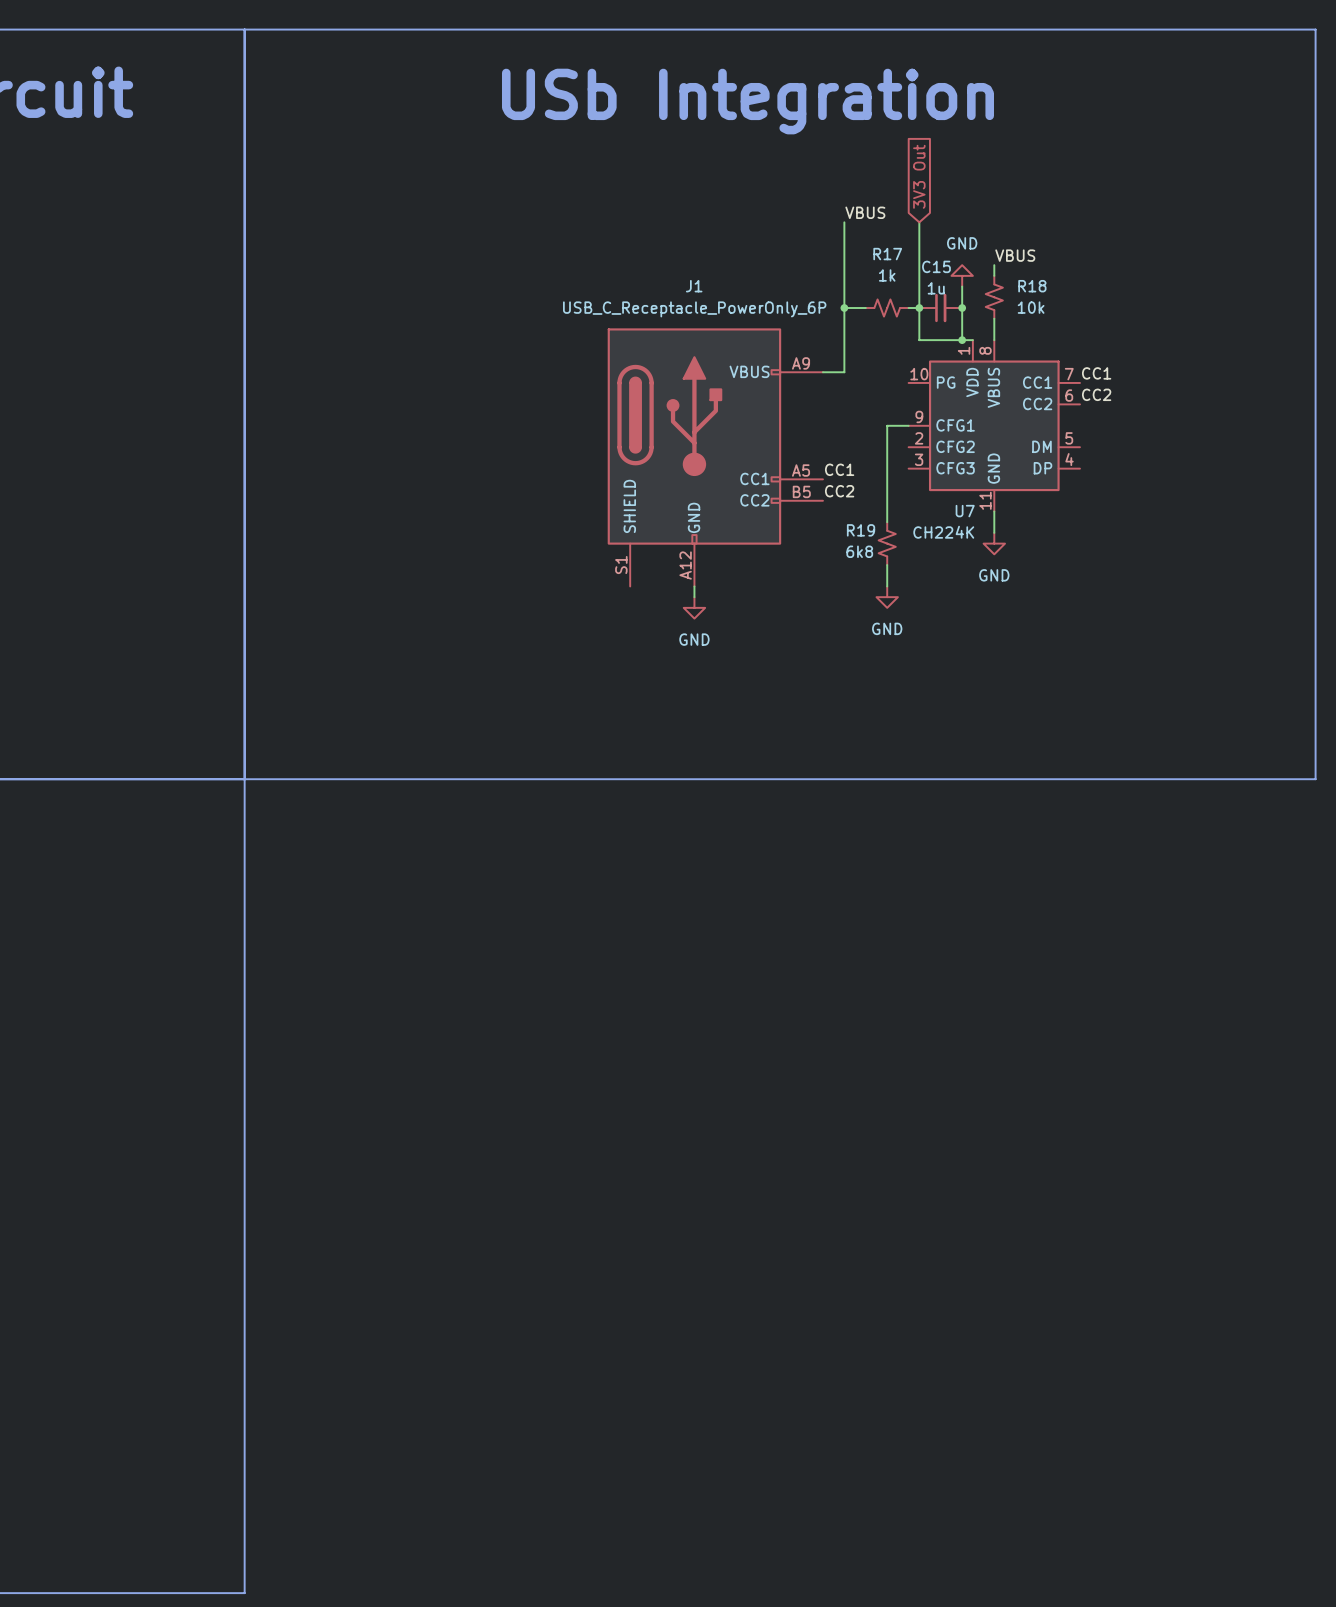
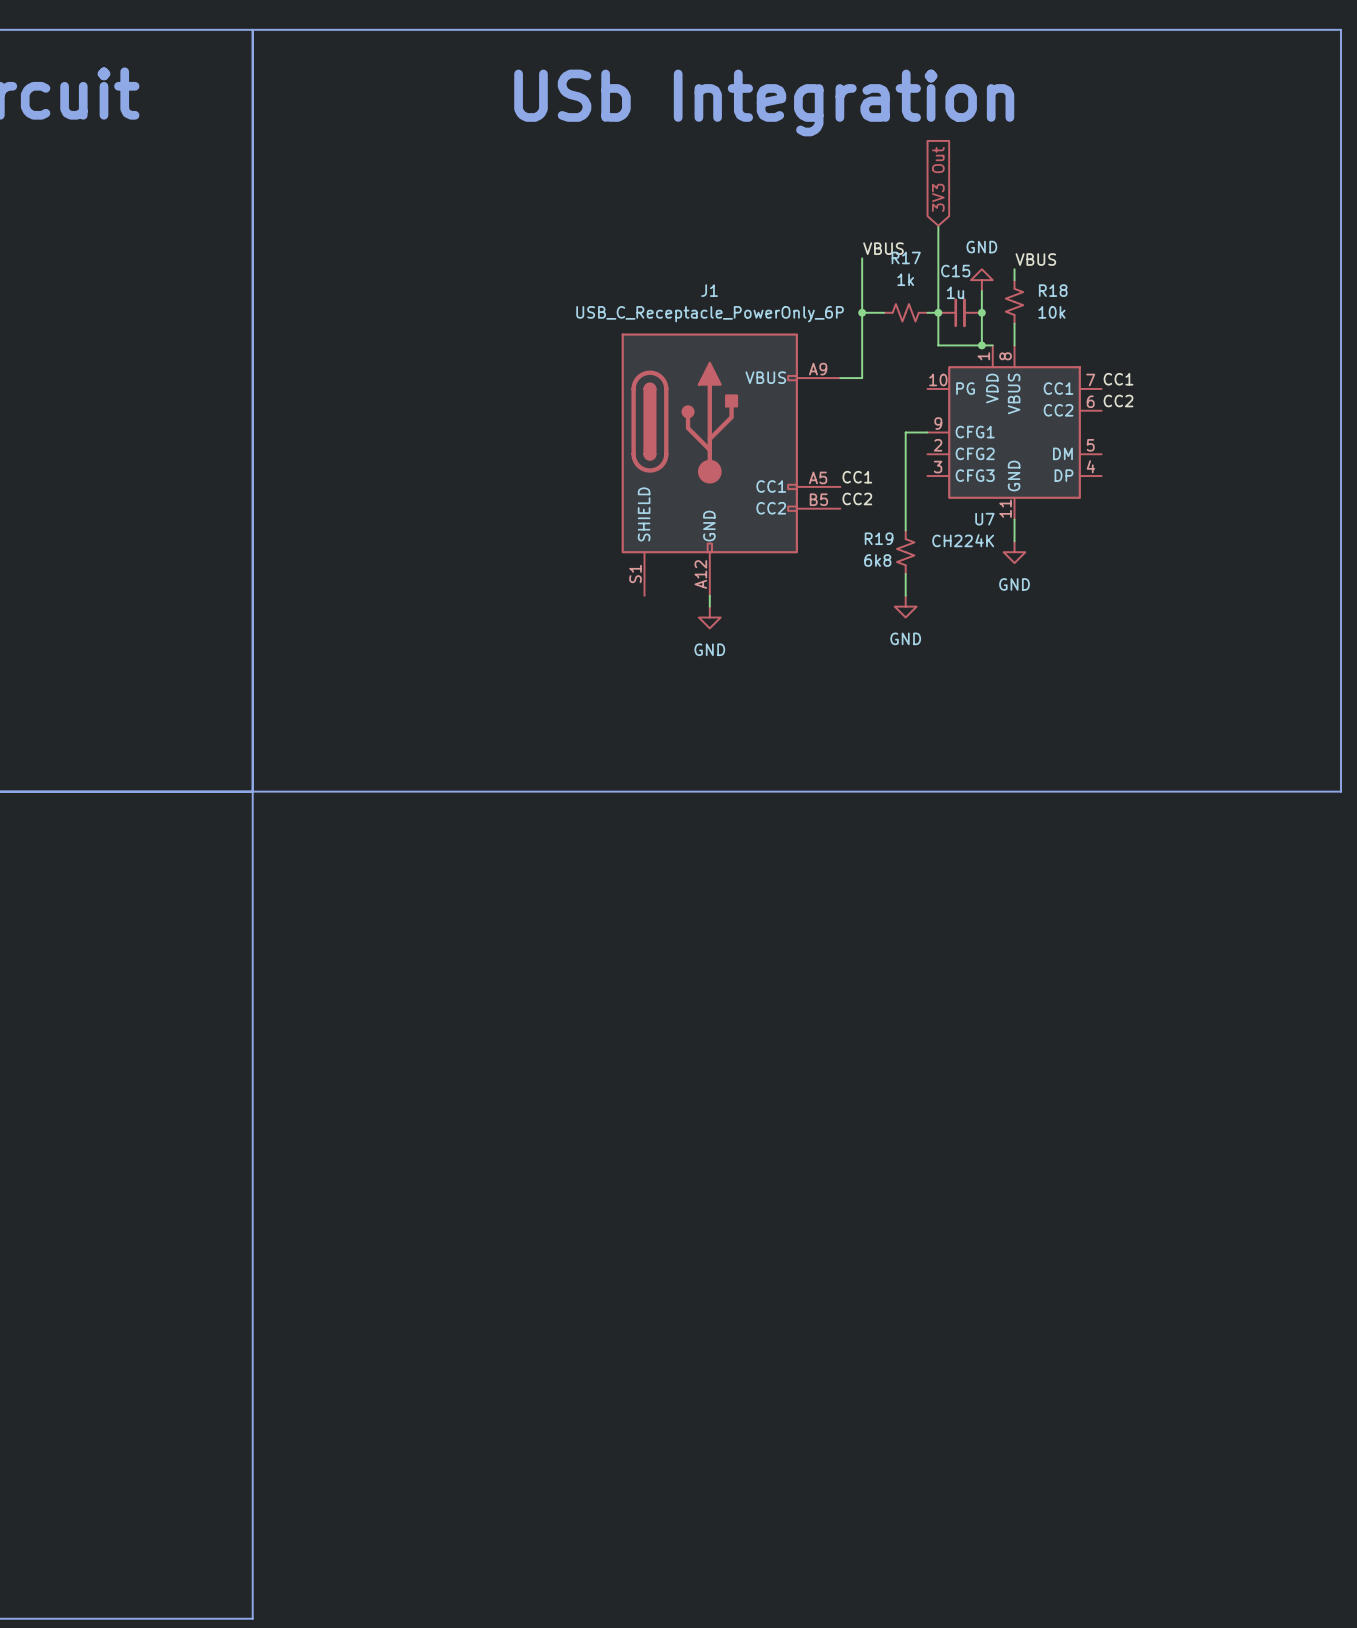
label position: VBUS (865, 212) -> VBUS (883, 248)
wire: (844, 222) (844, 254) -> none

